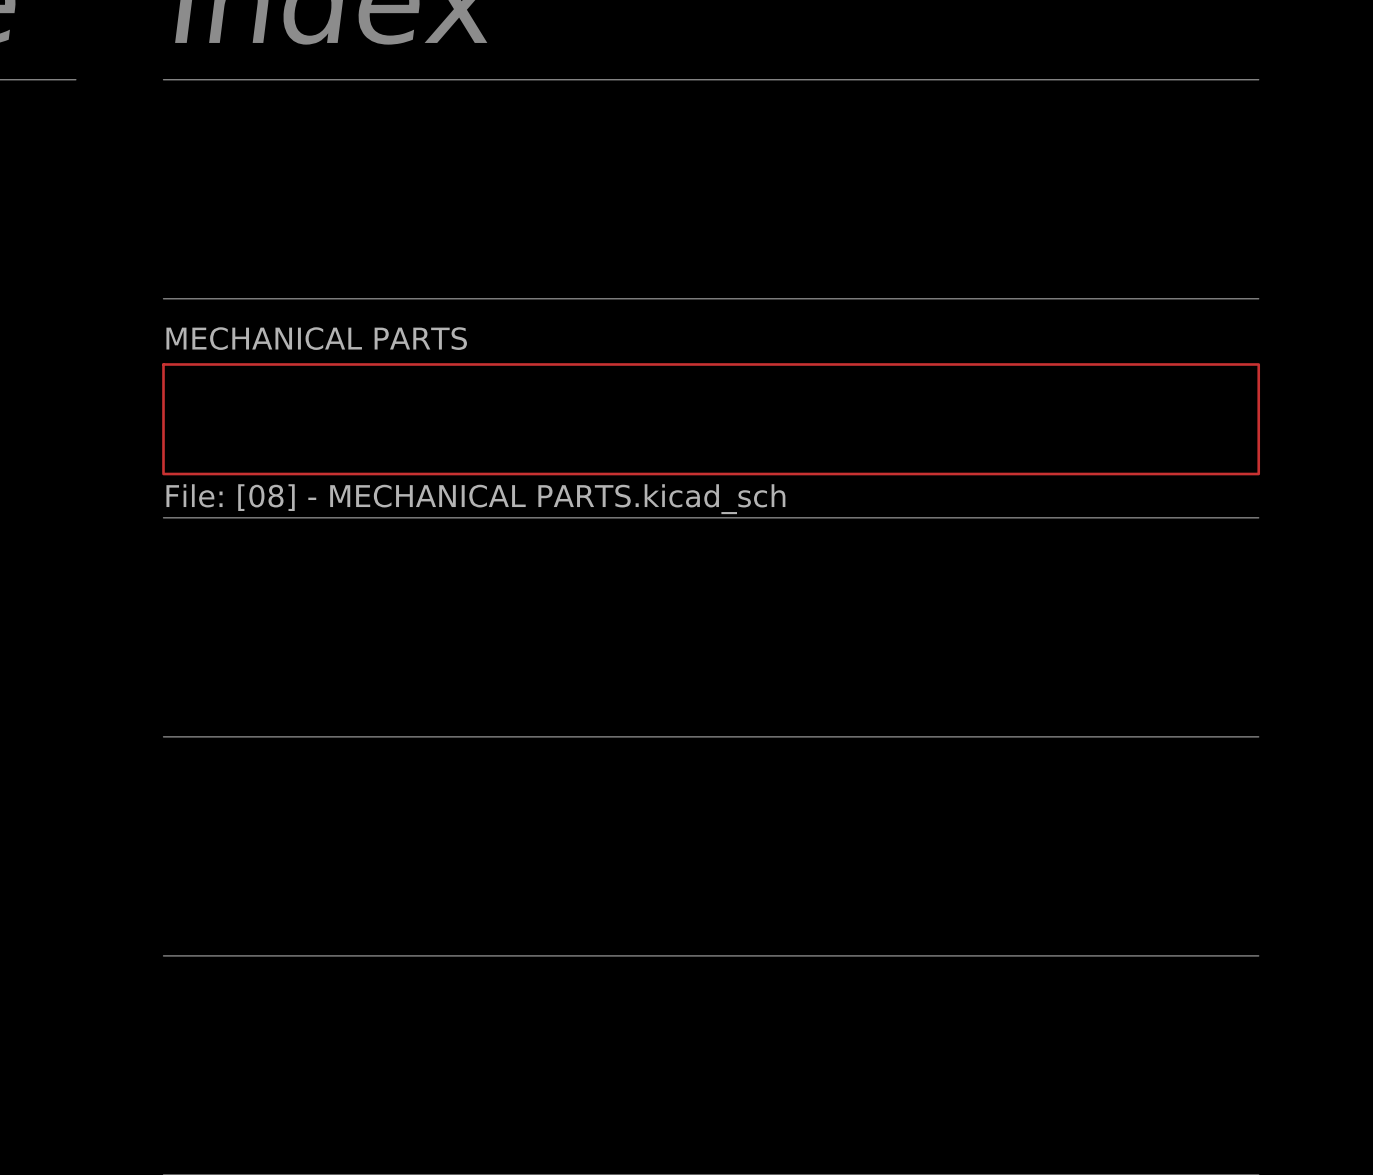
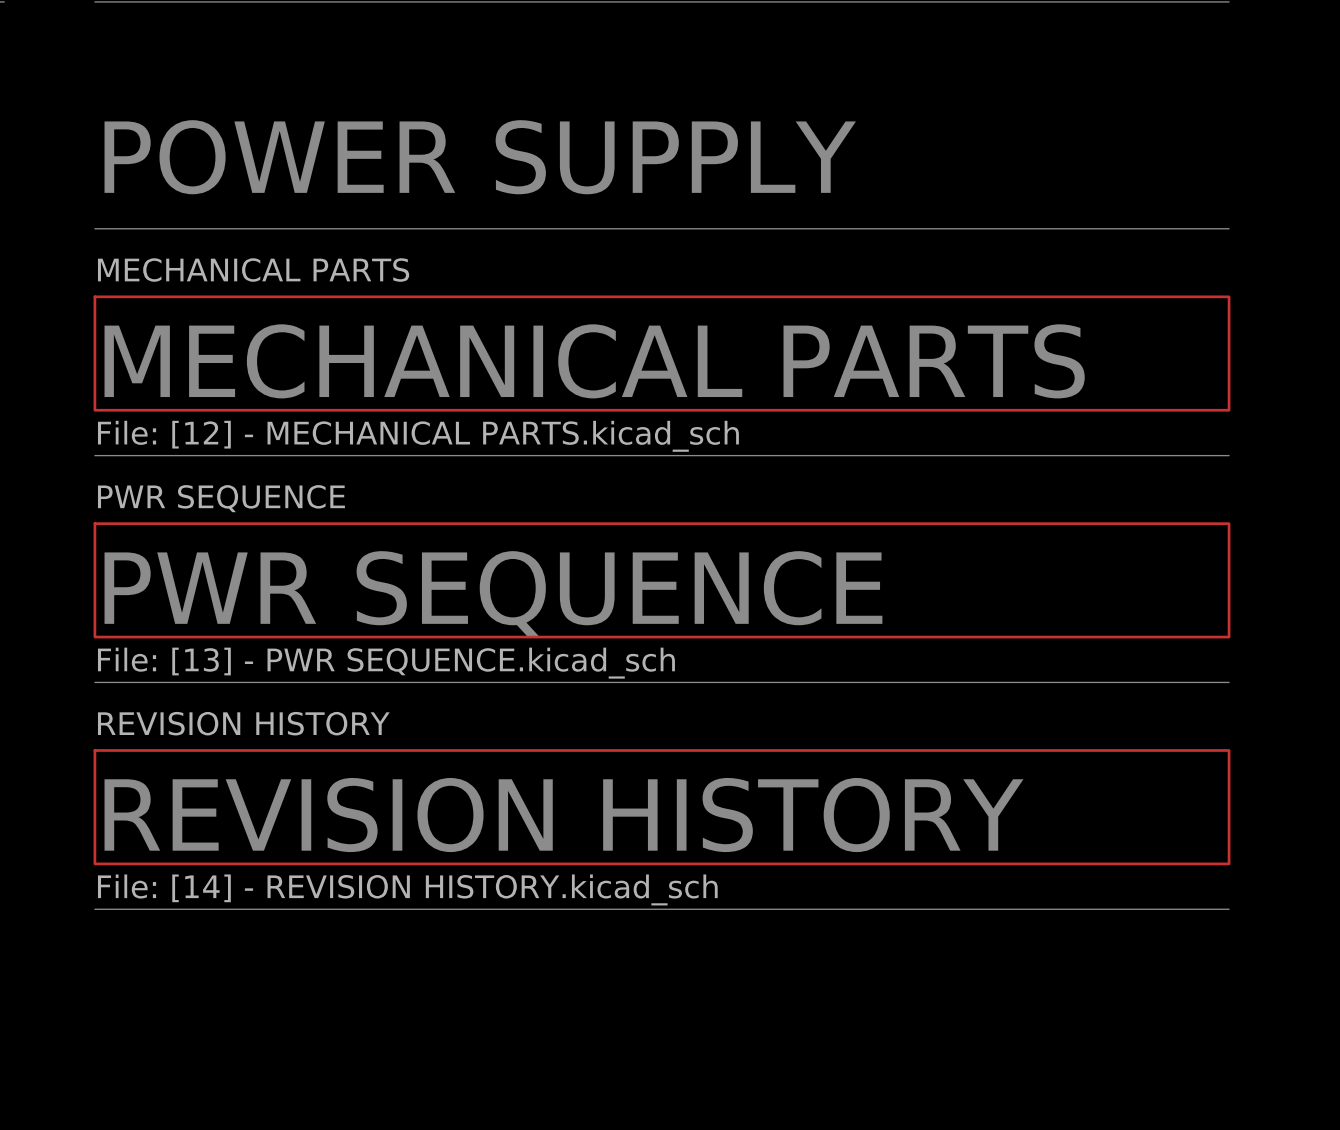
text: none -> POWER SUPPLY (480, 157)
text: none -> MECHANICAL PARTS (594, 361)
sheet MECHANICAL PARTS value: File: [08] - MECHANICAL PARTS.kicad_sch (475, 499) -> File: [12] - MECHANICAL PARTS.kicad_sch (418, 436)
sheet PWR SEQUENCE: none -> File: [13] - PWR SEQUENCE.kicad_sch (661, 580)
text: none -> PWR SEQUENCE (493, 593)
sheet REVISION HISTORY: none -> File: [14] - REVISION HISTORY.kicad_sch (661, 807)
text: none -> REVISION HISTORY (563, 815)

